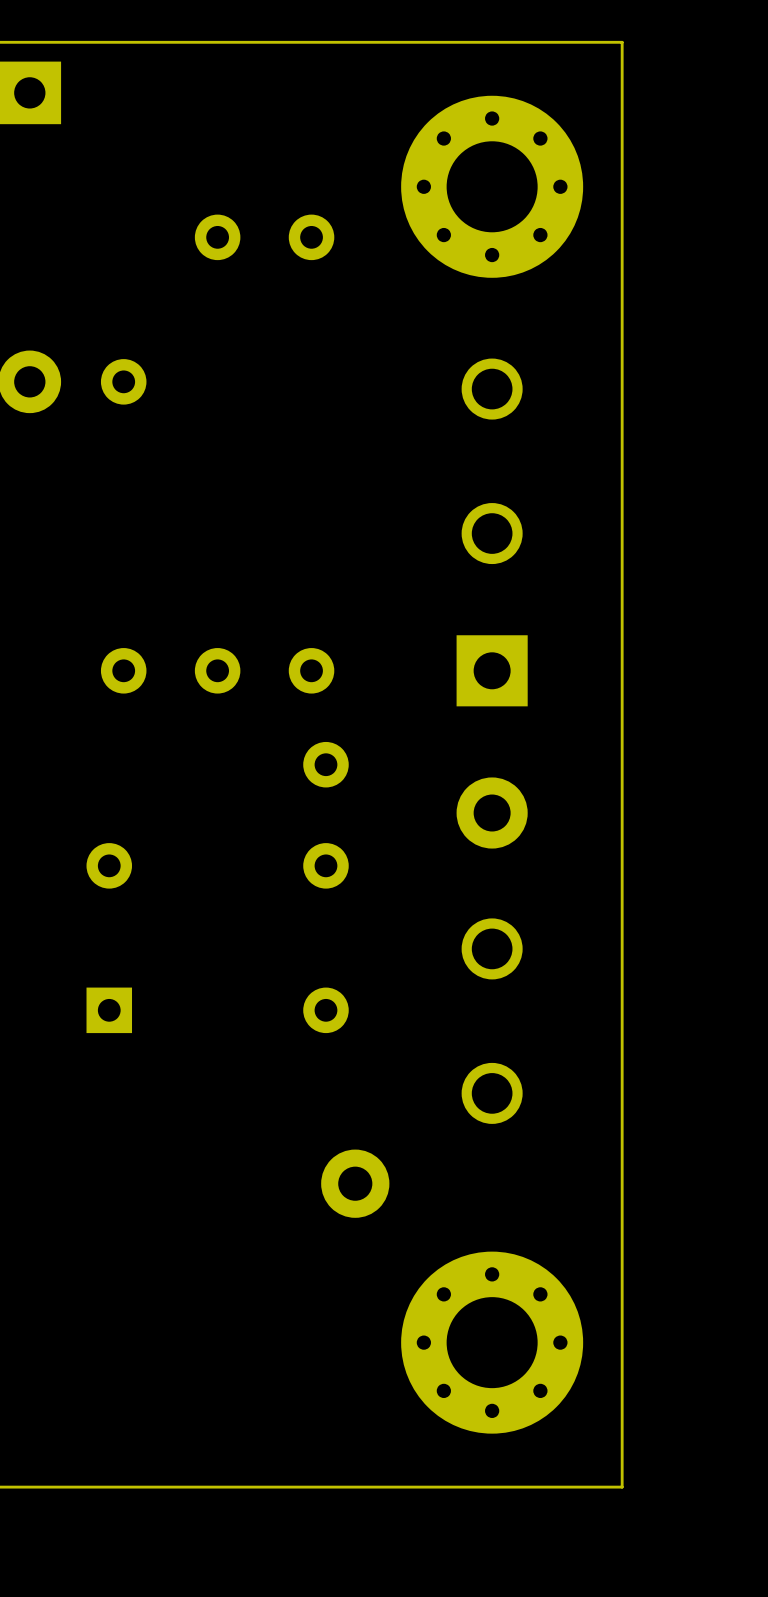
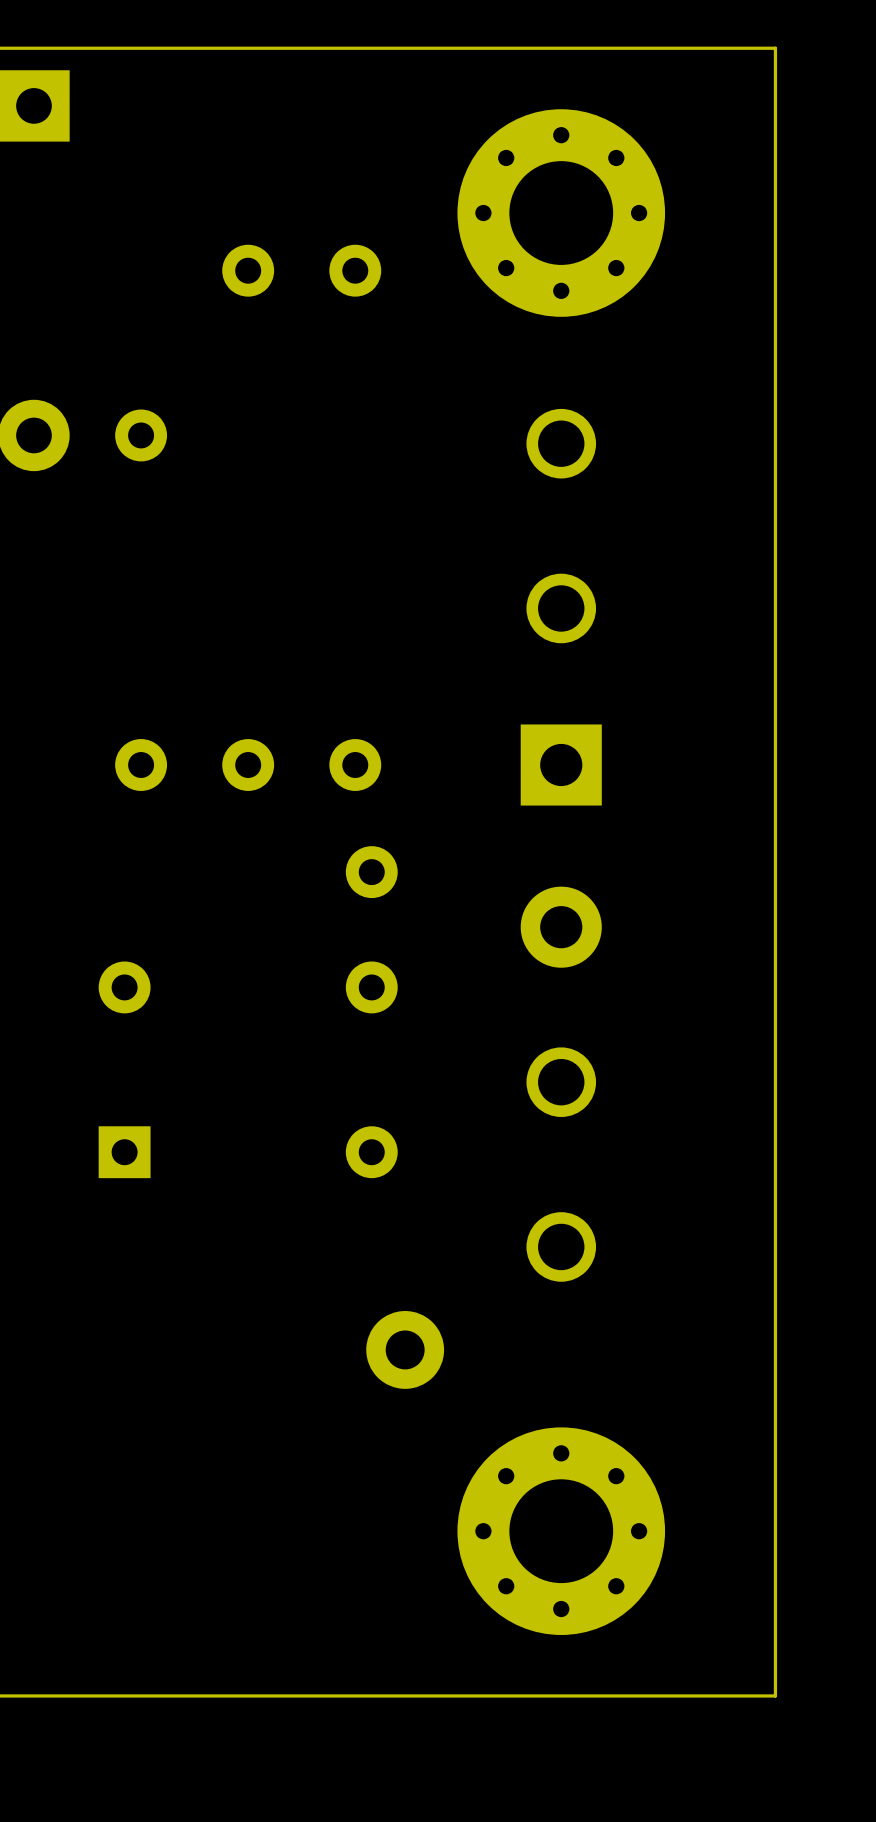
board edge: (622, 42) (622, 1487) -> (709, 48) (775, 48) (775, 1695) (709, 1695)

